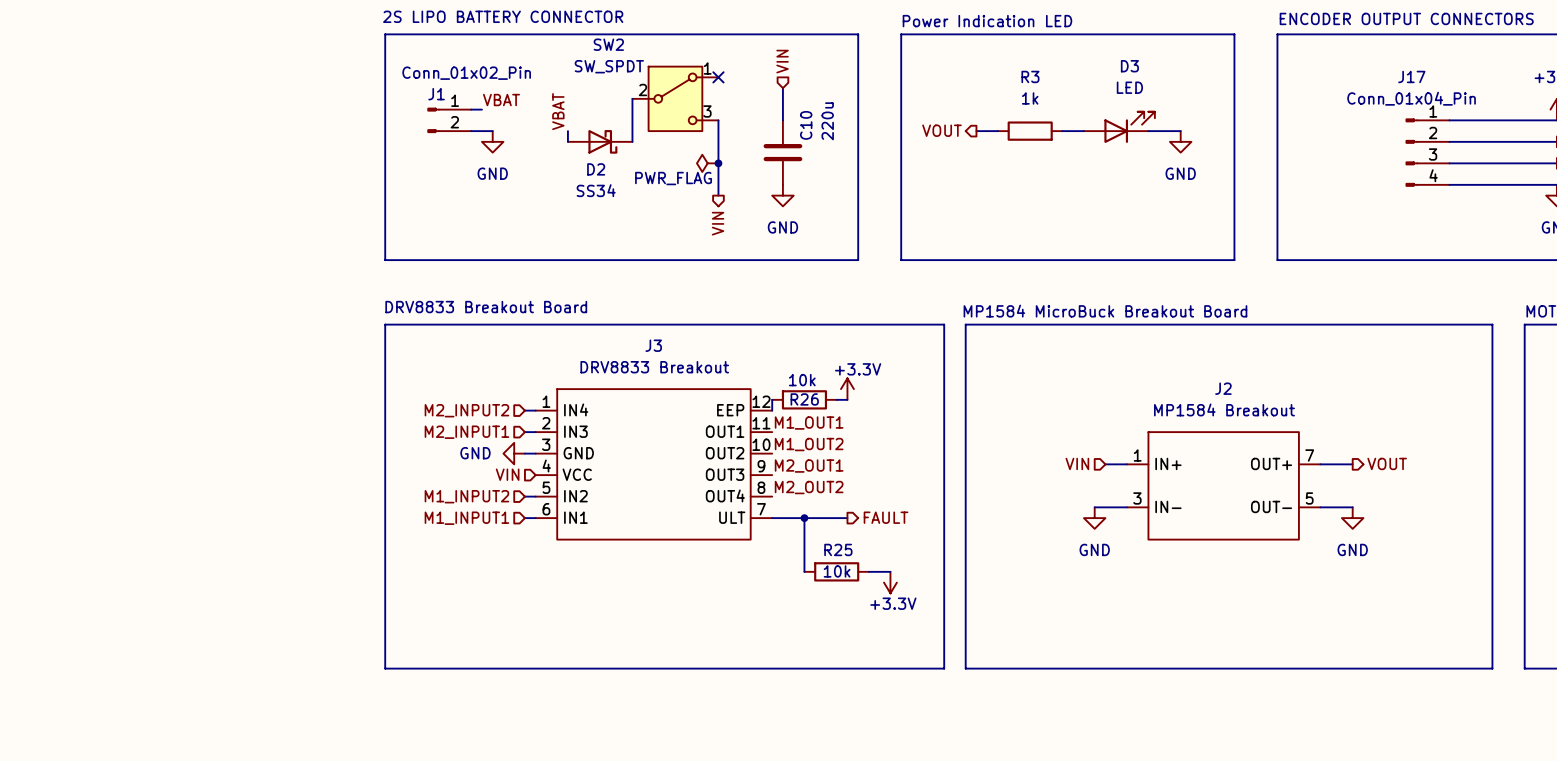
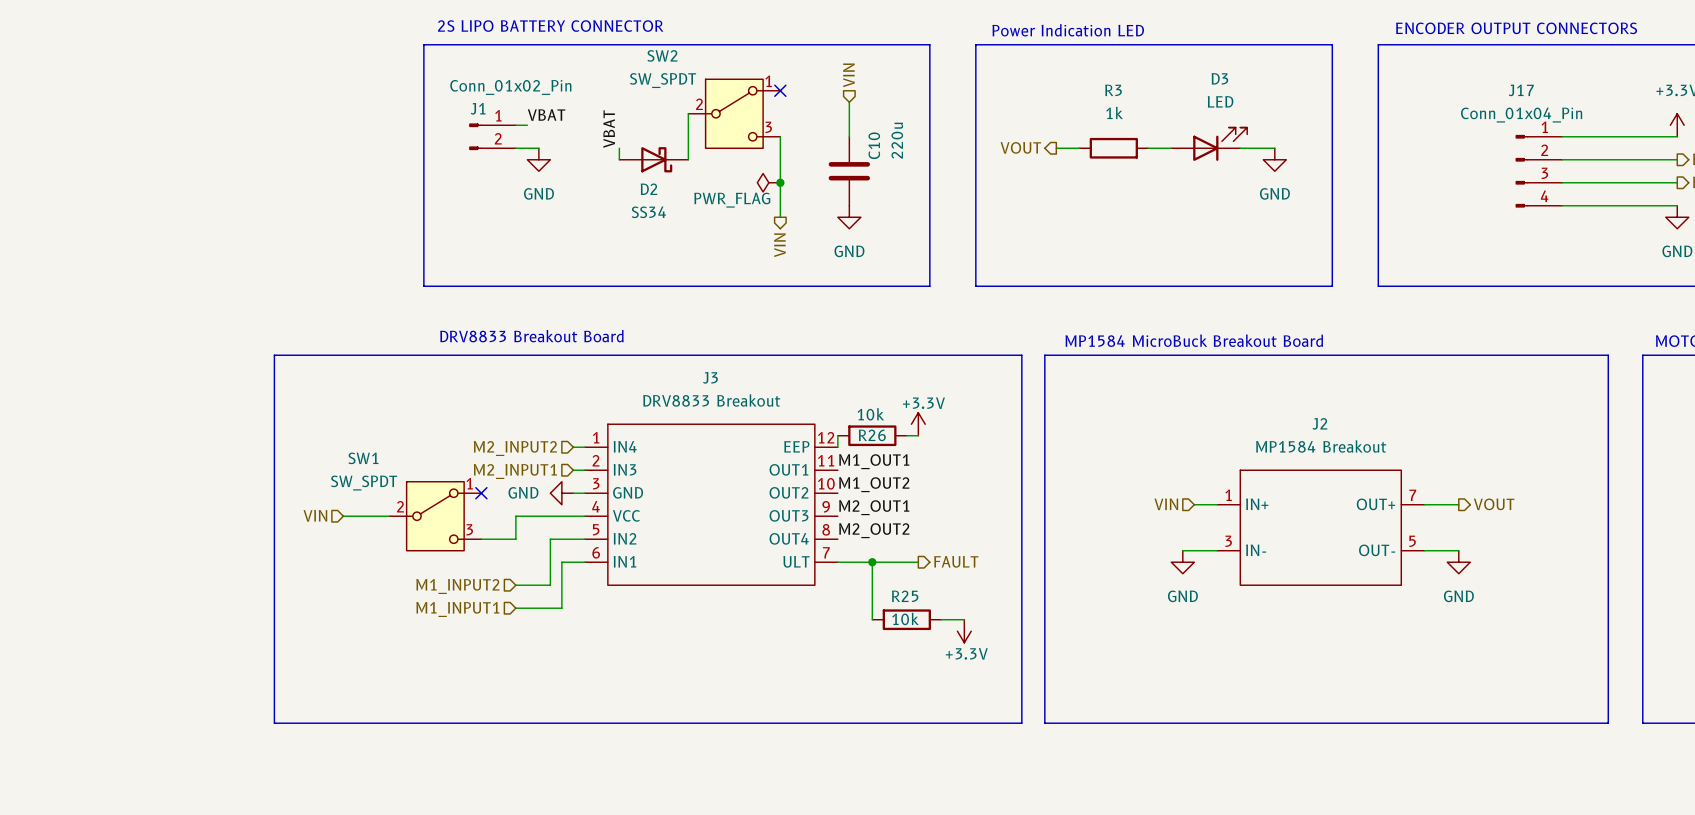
line: (385, 324) (385, 668) -> (423, 355) (274, 355) (274, 723) (423, 723)
no-connect mark: none -> (481, 493)
hierarchical label: none -> VIN (315, 515)
hierarchical label: VIN (507, 474) -> none
wire: none -> (343, 516) (389, 516)
SW1: none -> SW_SPDT (435, 516)
wire: none -> (584, 516) (515, 516) (515, 539) (481, 539)
hierarchical label position: M1_INPUT2 (466, 496) -> M1_INPUT2 (457, 586)
wire: none -> (573, 539) (550, 539) (550, 585) (515, 585)
hierarchical label position: M1_INPUT1 (466, 518) -> M1_INPUT1 (457, 609)
wire: none -> (573, 562) (561, 562) (561, 608) (515, 608)

